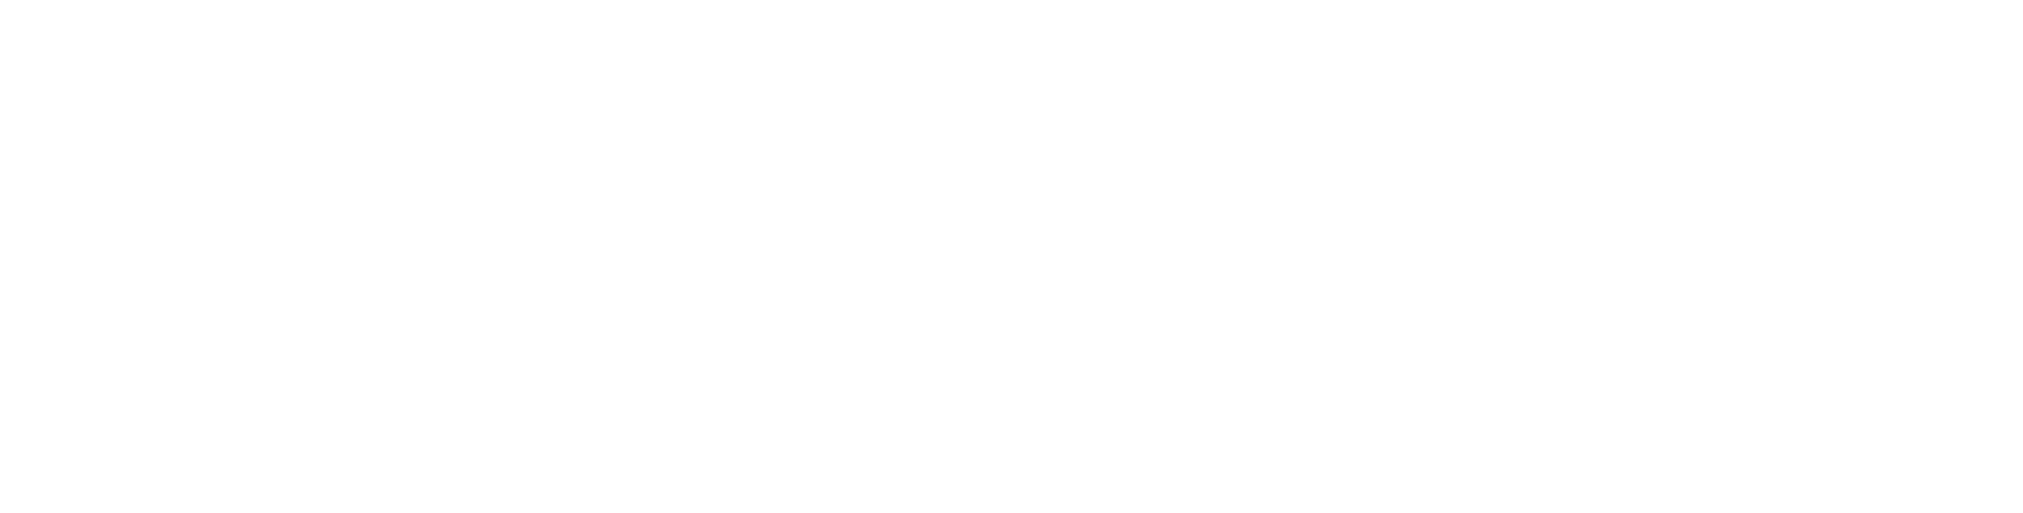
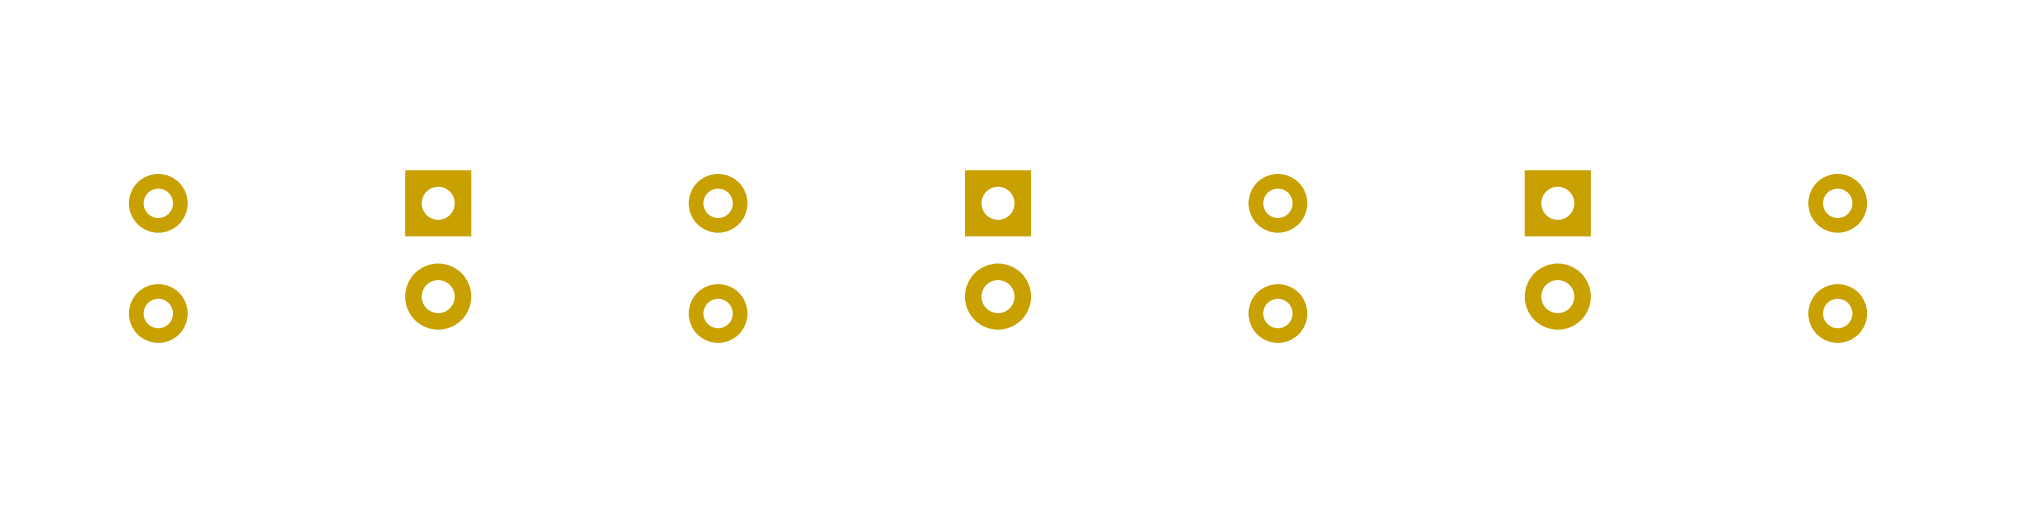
part: none -> (438, 249)
part: none -> (998, 249)
part: none -> (1557, 249)
part: none -> (158, 258)
part: none -> (718, 258)
part: none -> (1277, 258)
part: none -> (1837, 258)

